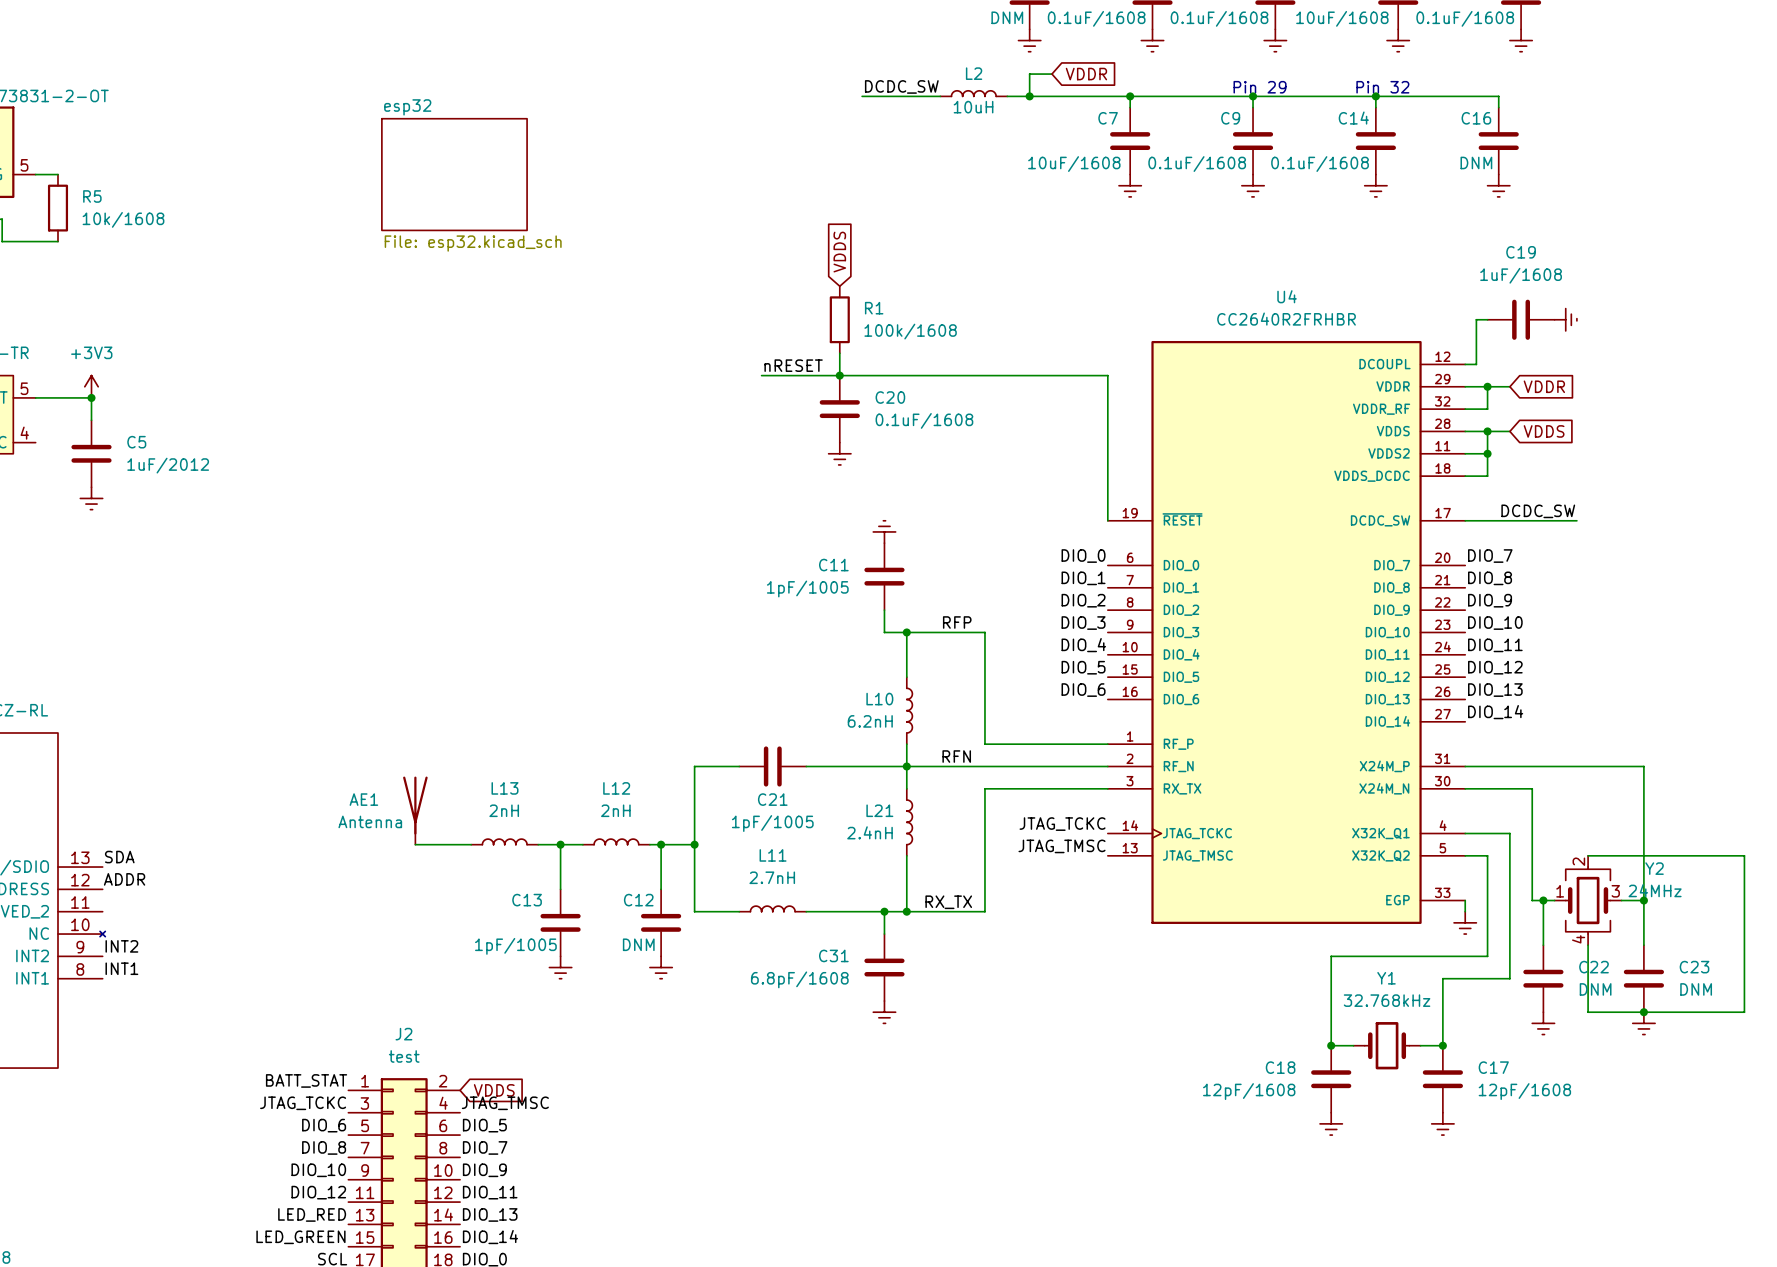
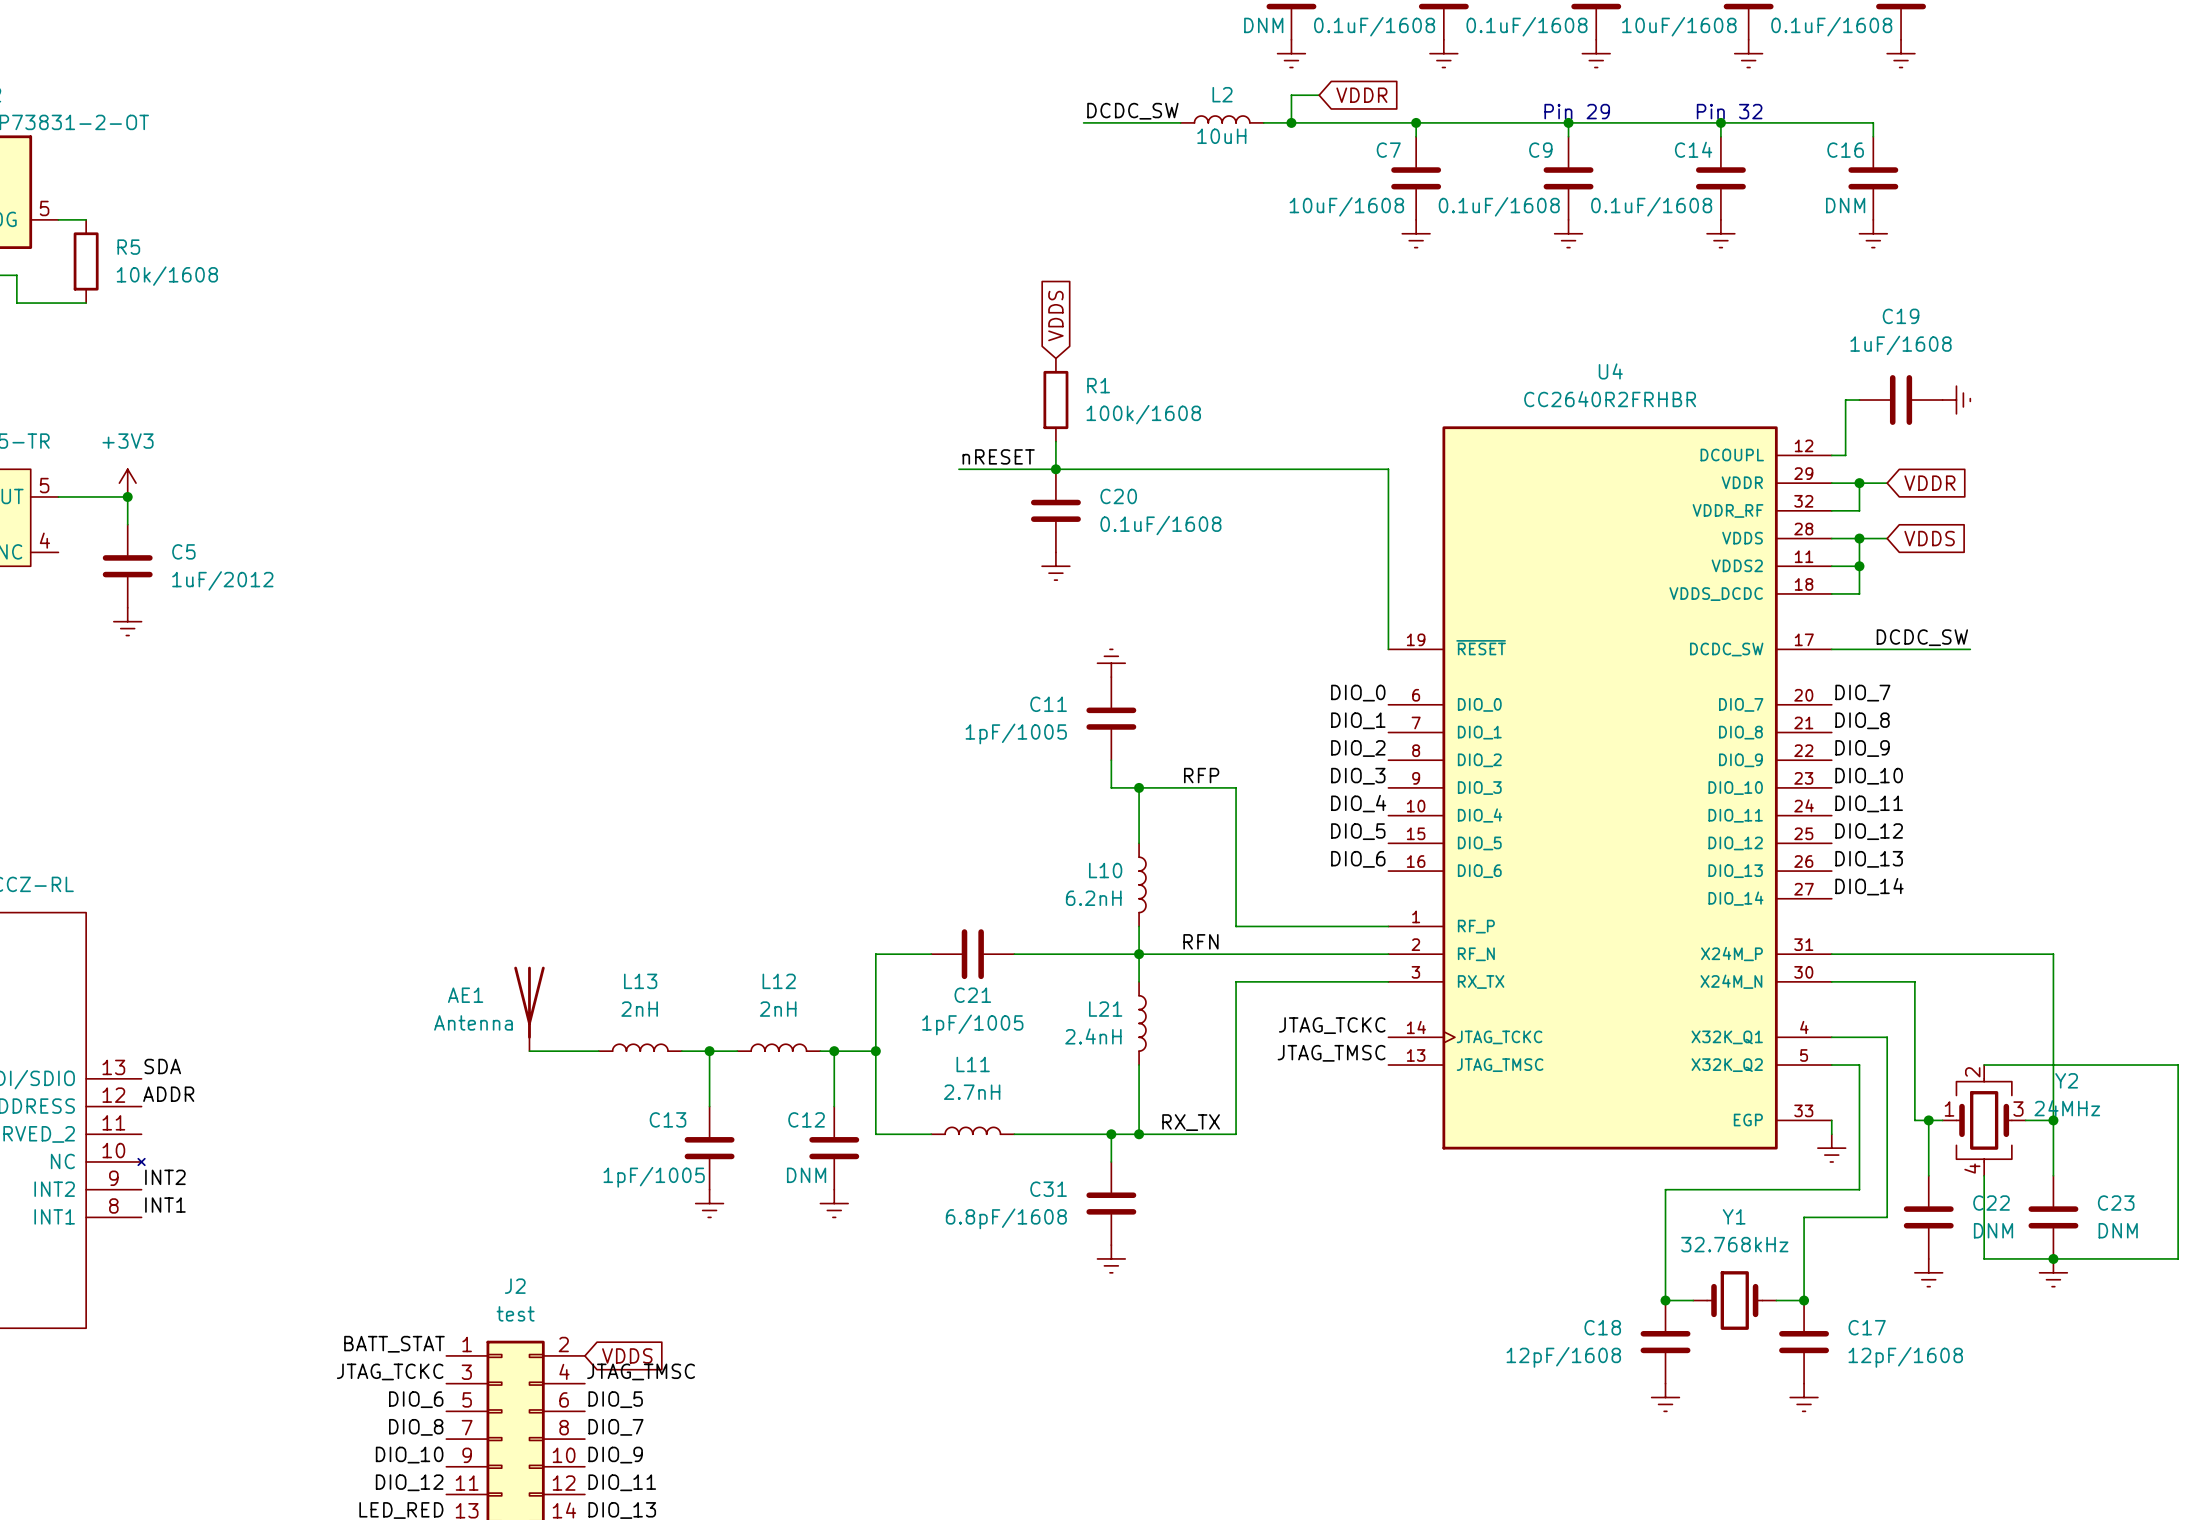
sheet esp32: File: esp32.kicad_sch (454, 174) -> none

